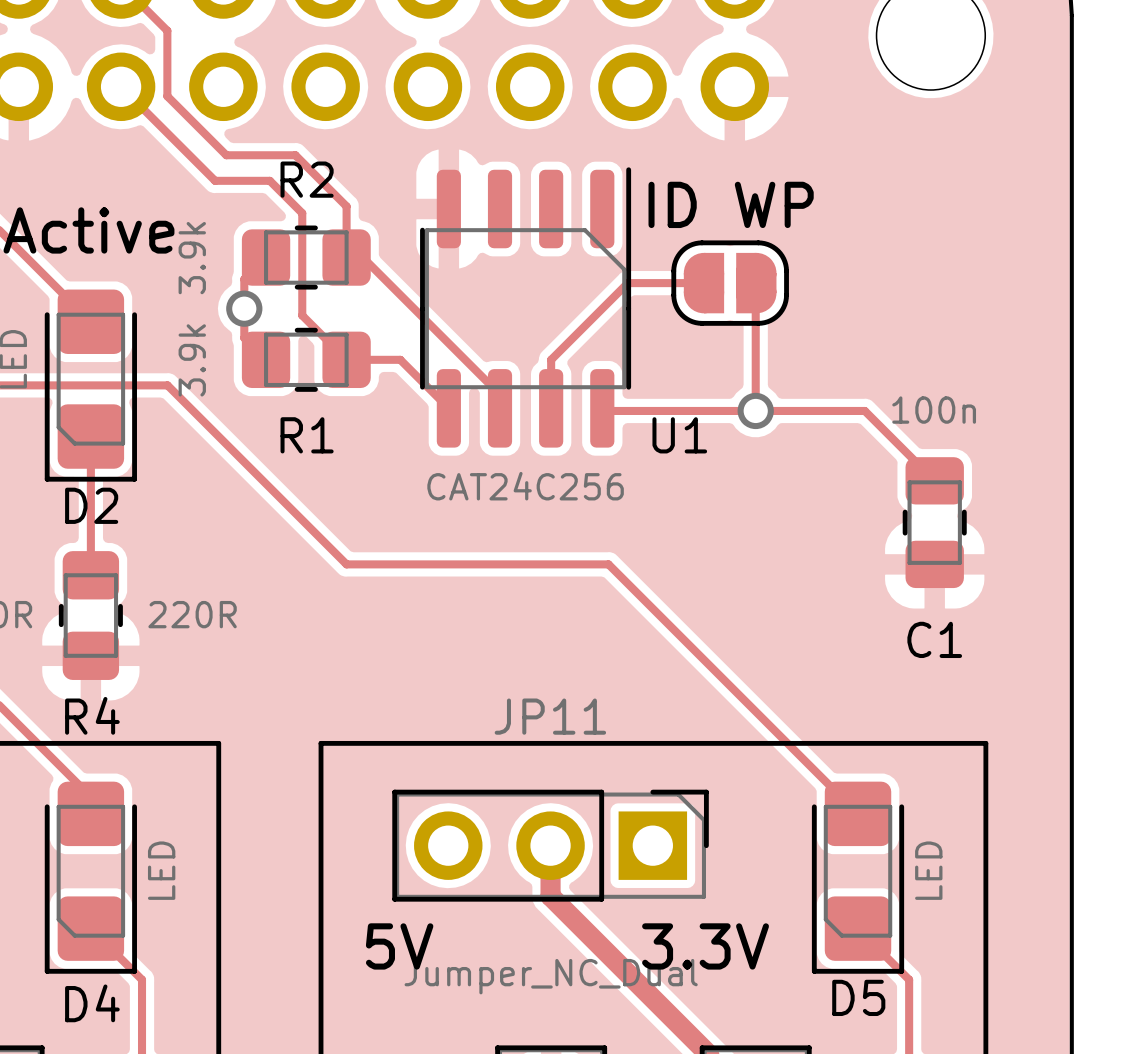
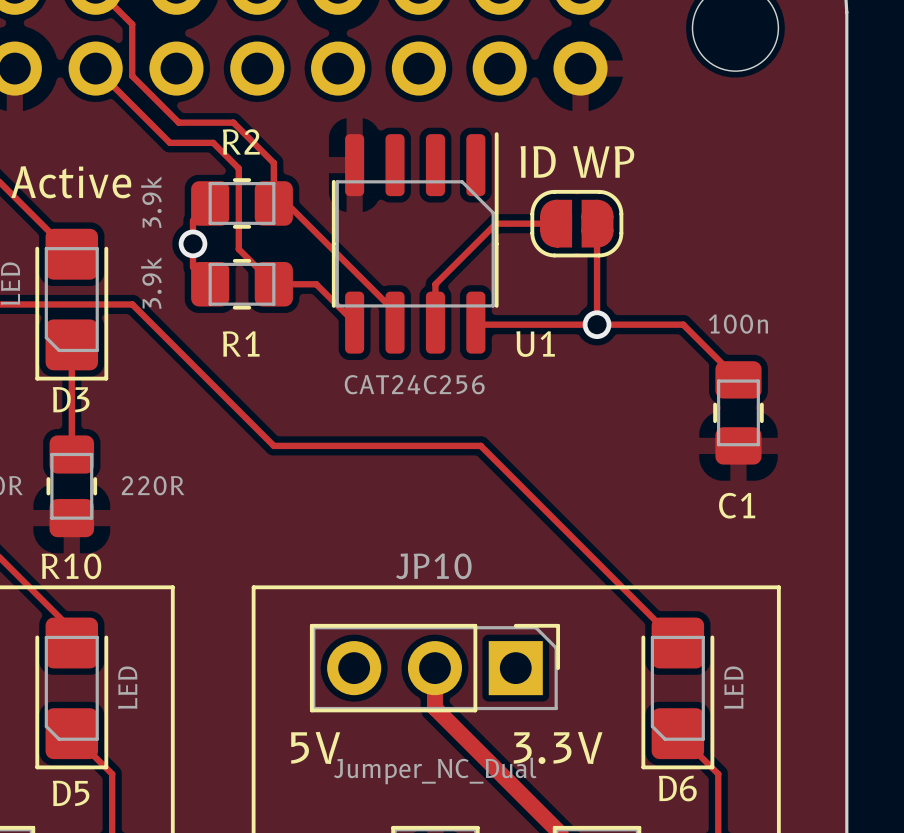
D2 name: D2 (91, 505) -> D3 (71, 399)
R4 name: R4 (92, 715) -> R10 (71, 566)
JP11 name: JP11 (550, 716) -> JP10 (433, 566)
D5 name: D5 (858, 997) -> D6 (677, 788)
D4 name: D4 (92, 1003) -> D5 (71, 793)

